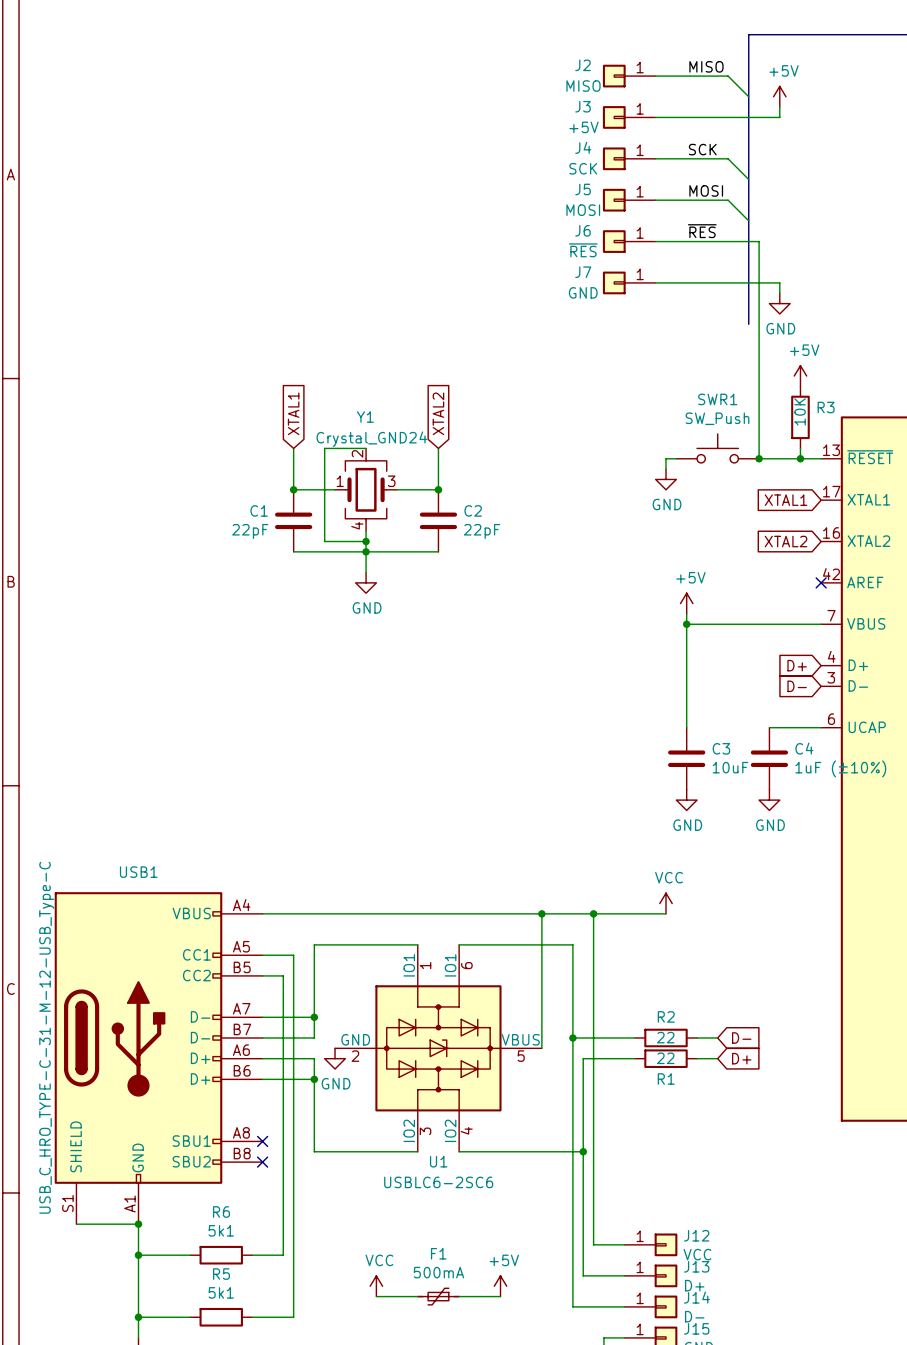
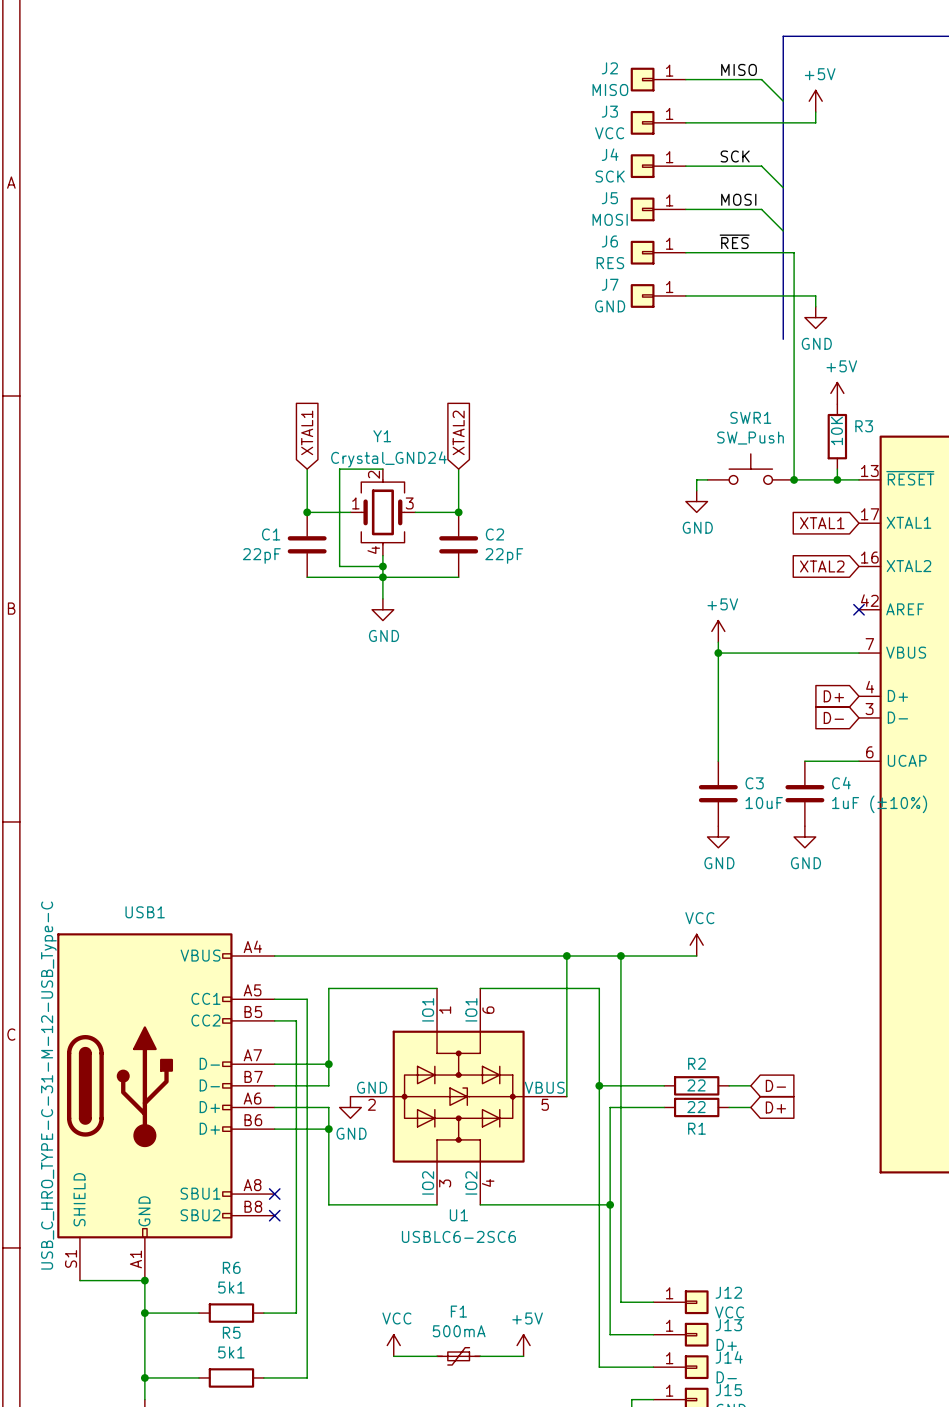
J3 value: +5V (583, 127) -> VCC (609, 133)
J6 value: ~{RES} (583, 250) -> RES (610, 263)

